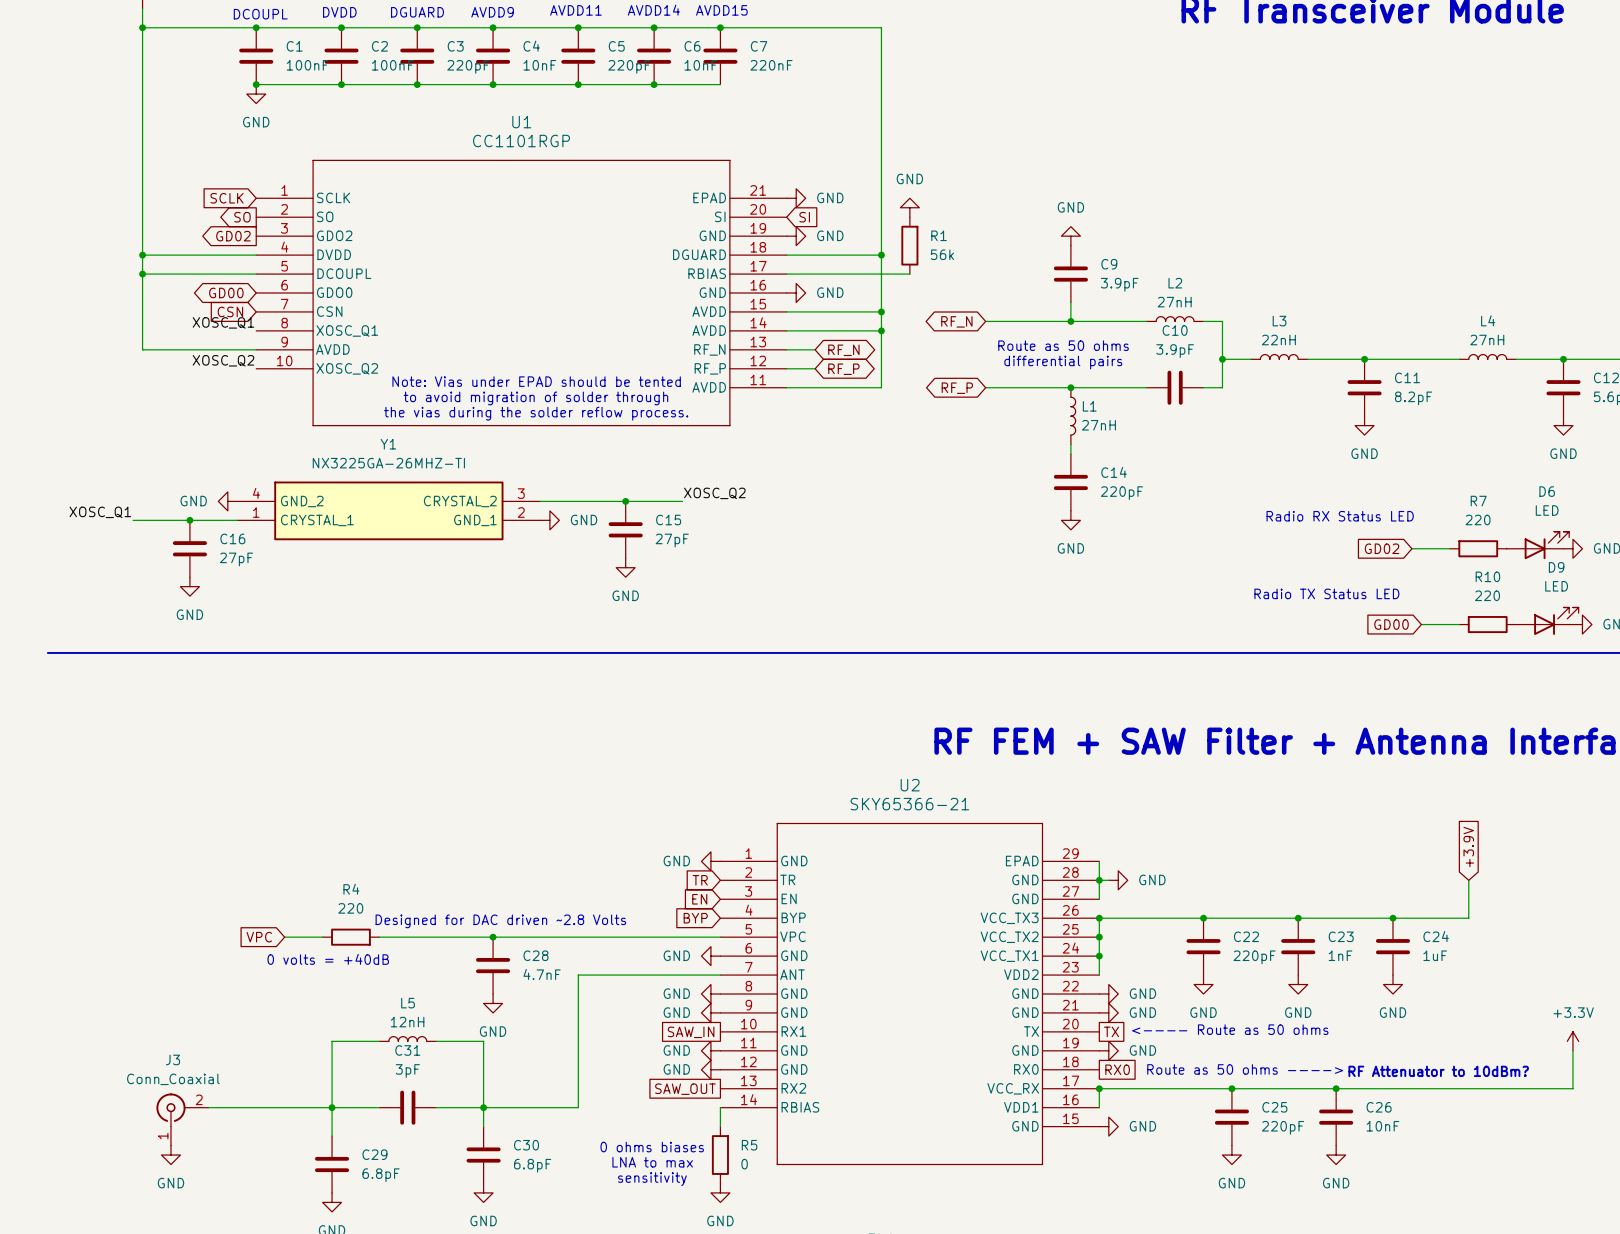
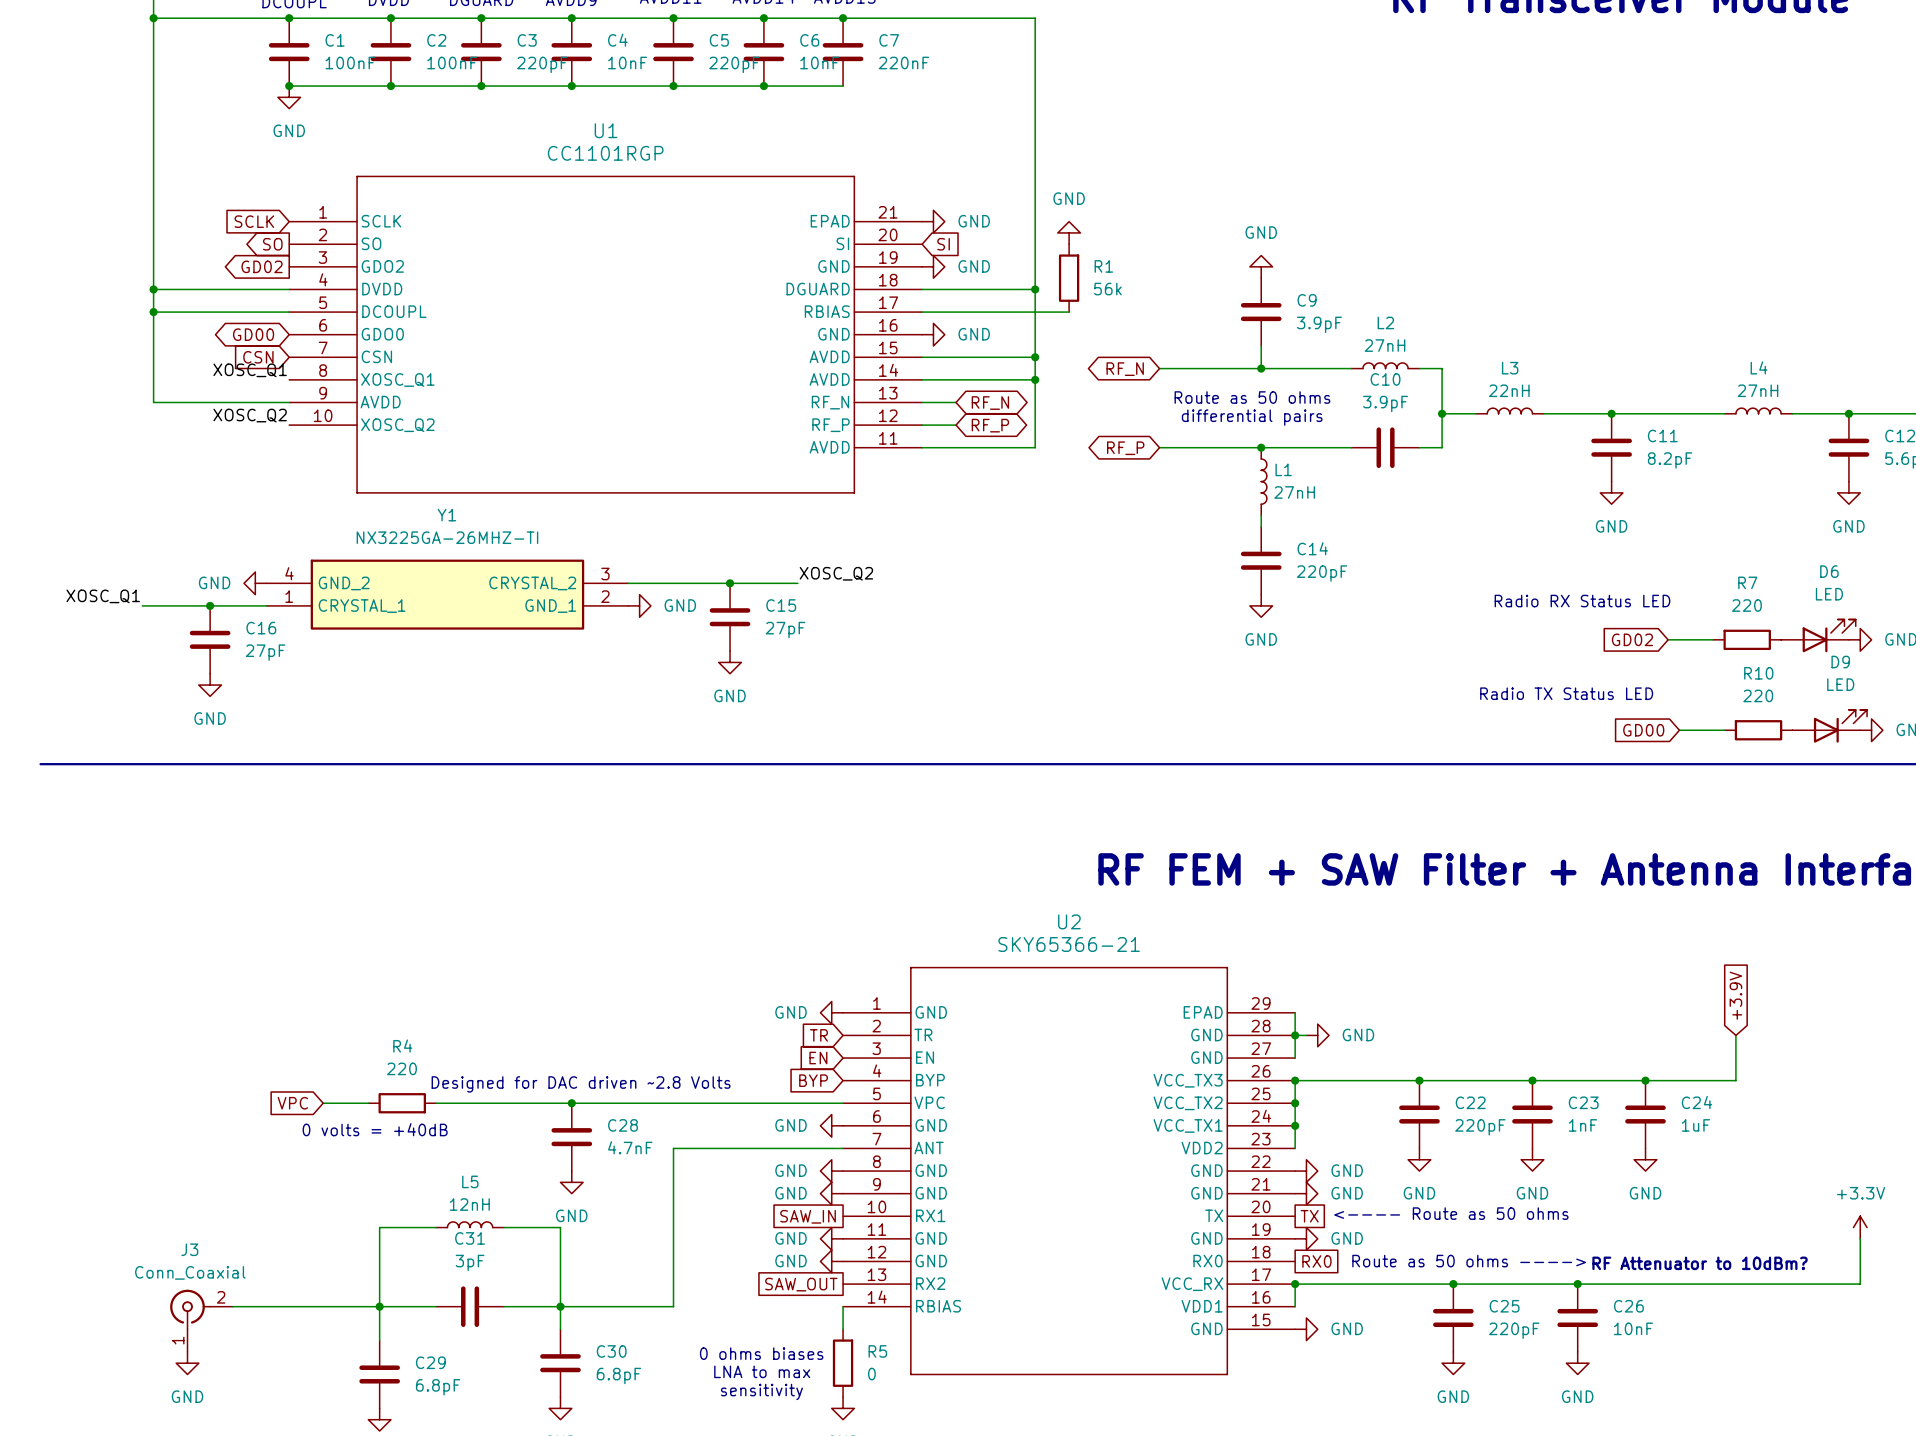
text: Note: Vias under EPAD should be tented (536, 381) -> none
text: to avoid migration of solder through (535, 398) -> none
text: the vias during the solder reflow process. (536, 413) -> none

